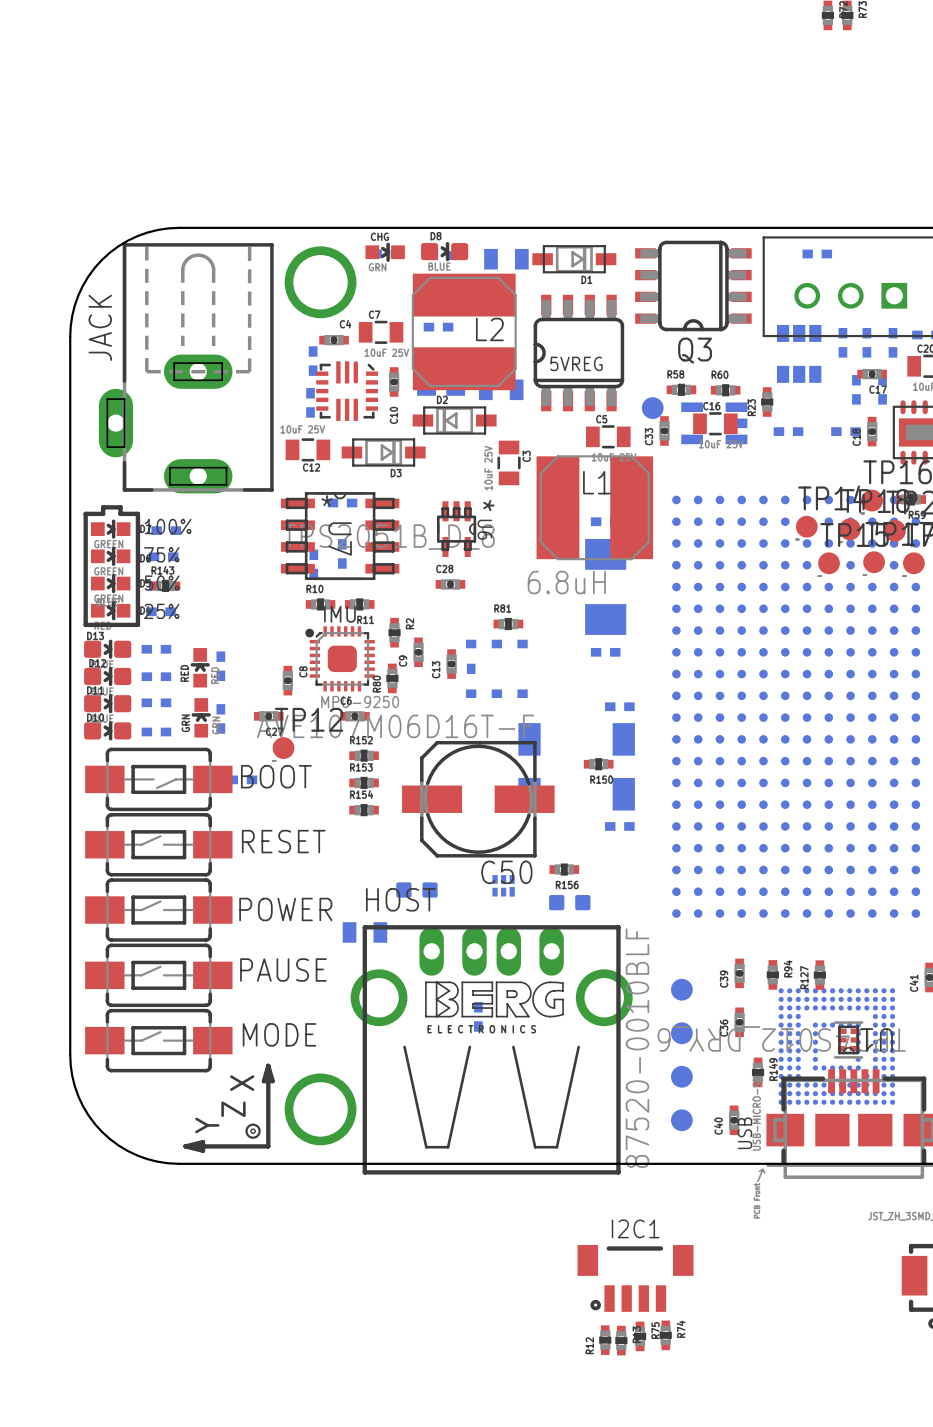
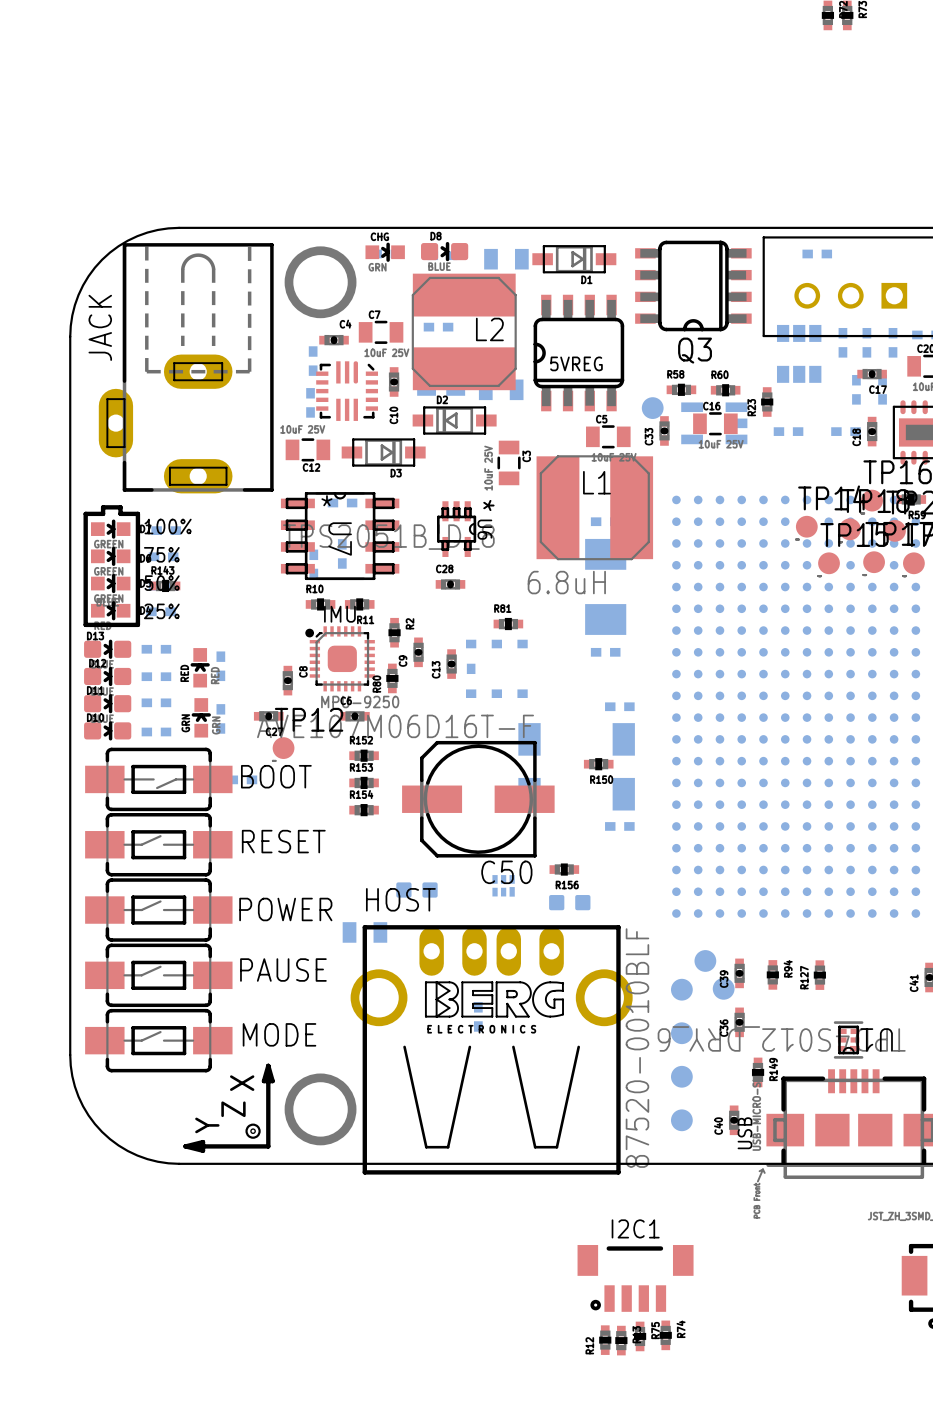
part: none -> (705, 960)
part: none -> (723, 988)
part: (836, 1046) -> none

